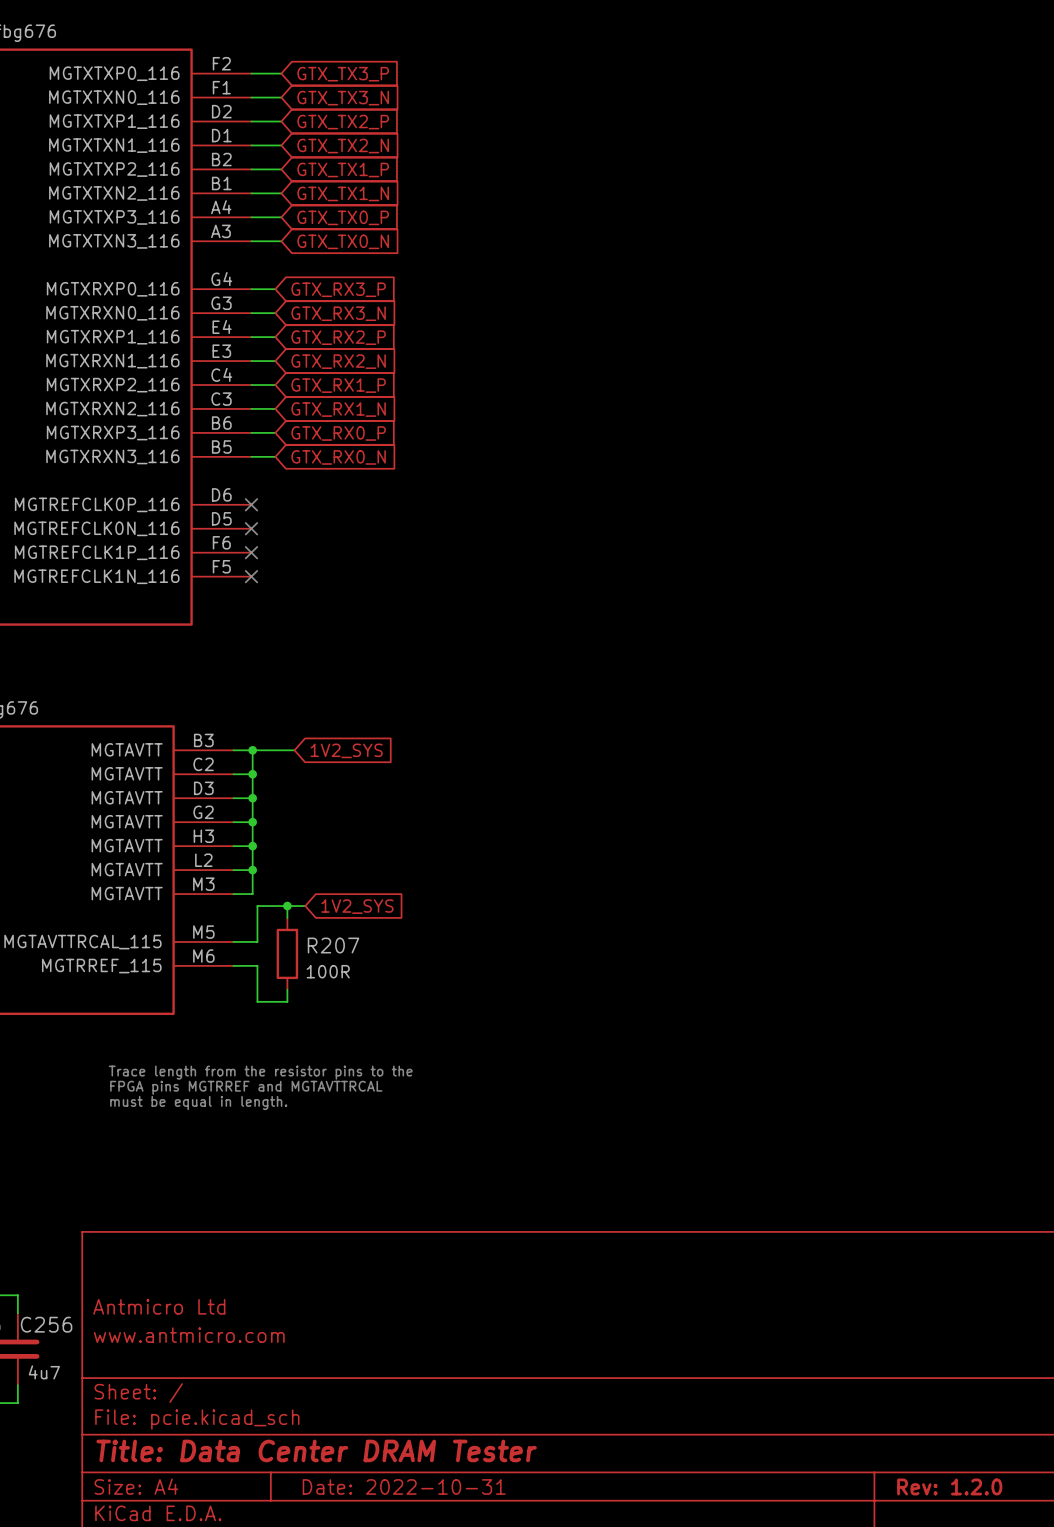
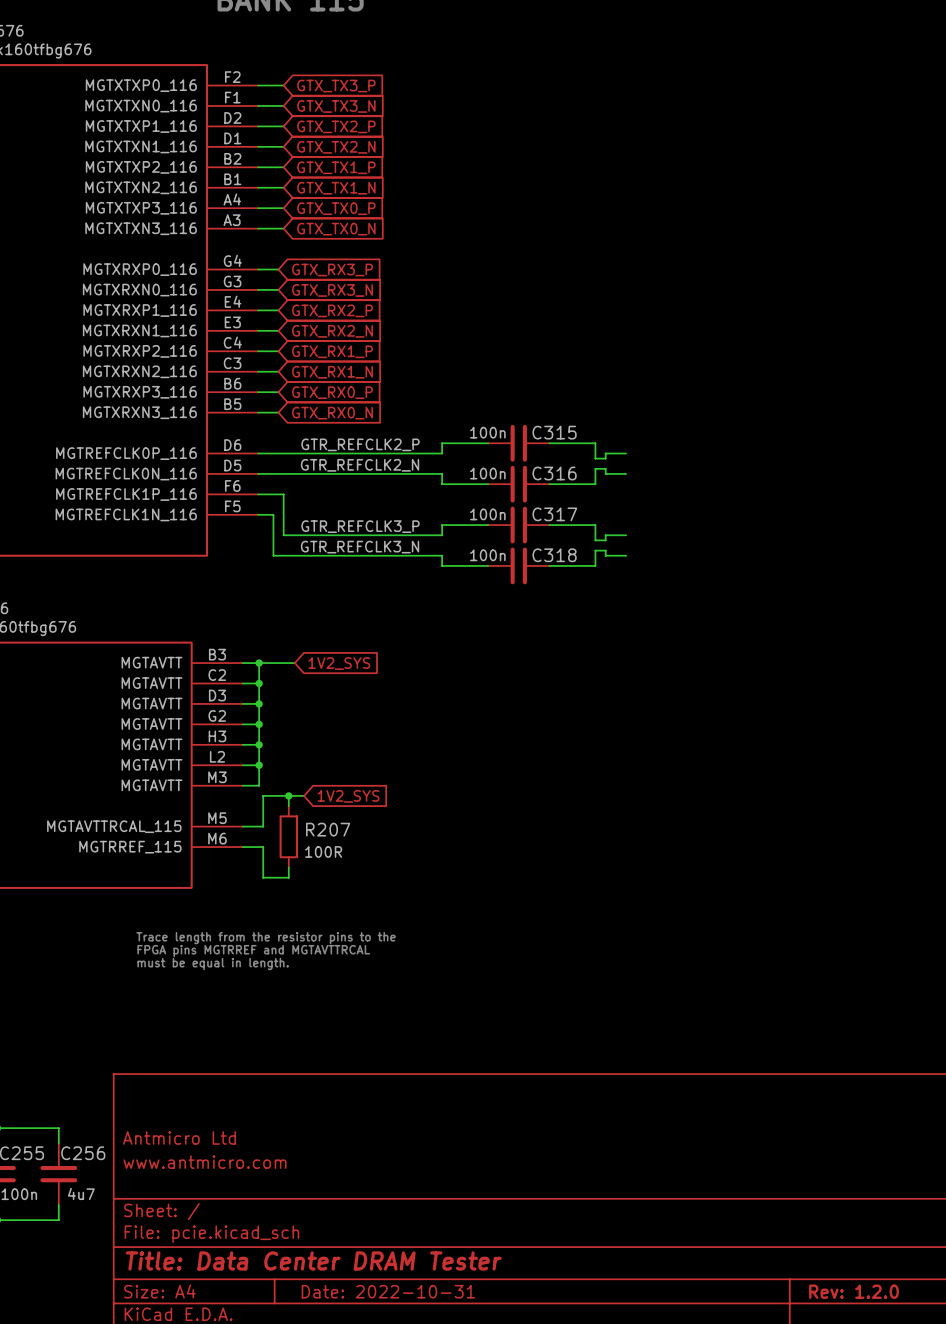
wire: none -> (488, 443) (442, 443) (442, 453) (258, 453)
C315: none -> (518, 443)
wire: none -> (549, 443) (595, 443) (595, 458) (605, 458) (605, 453) (626, 453)
label: none -> GTR_REFCLK2_P (360, 444)
no-connect mark: (251, 504) -> none
label: none -> GTR_REFCLK2_N (360, 465)
wire: none -> (258, 473) (442, 473) (442, 484) (488, 484)
no-connect mark: (251, 528) -> none
wire: none -> (626, 473) (605, 473) (605, 468) (595, 468) (595, 484) (549, 484)
C316: none -> (518, 484)
wire: none -> (258, 494) (283, 494) (283, 535) (442, 535) (442, 525) (488, 525)
no-connect mark: (251, 552) -> none
wire: none -> (258, 514) (273, 514) (273, 555) (442, 555) (442, 565) (488, 565)
no-connect mark: (251, 576) -> none
C317: none -> (518, 525)
wire: none -> (549, 525) (595, 525) (595, 540) (605, 540) (605, 535) (626, 535)
label: none -> GTR_REFCLK3_P (360, 526)
label: none -> GTR_REFCLK3_N (360, 547)
wire: none -> (626, 555) (605, 555) (605, 550) (595, 550) (595, 565) (549, 565)
C318: none -> (518, 565)

